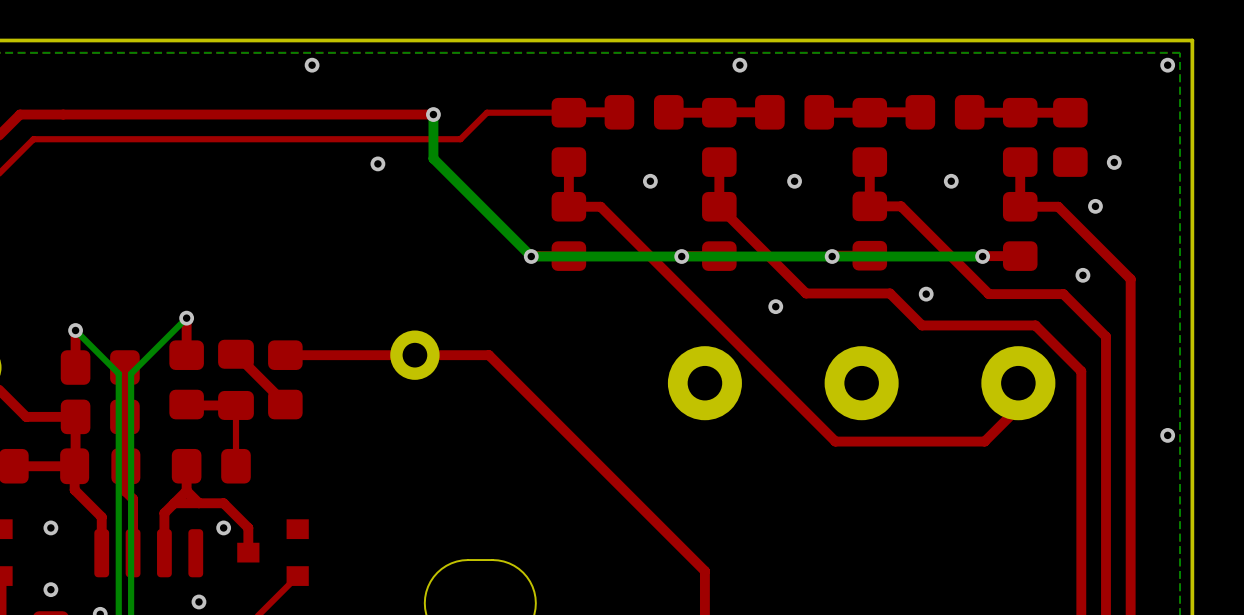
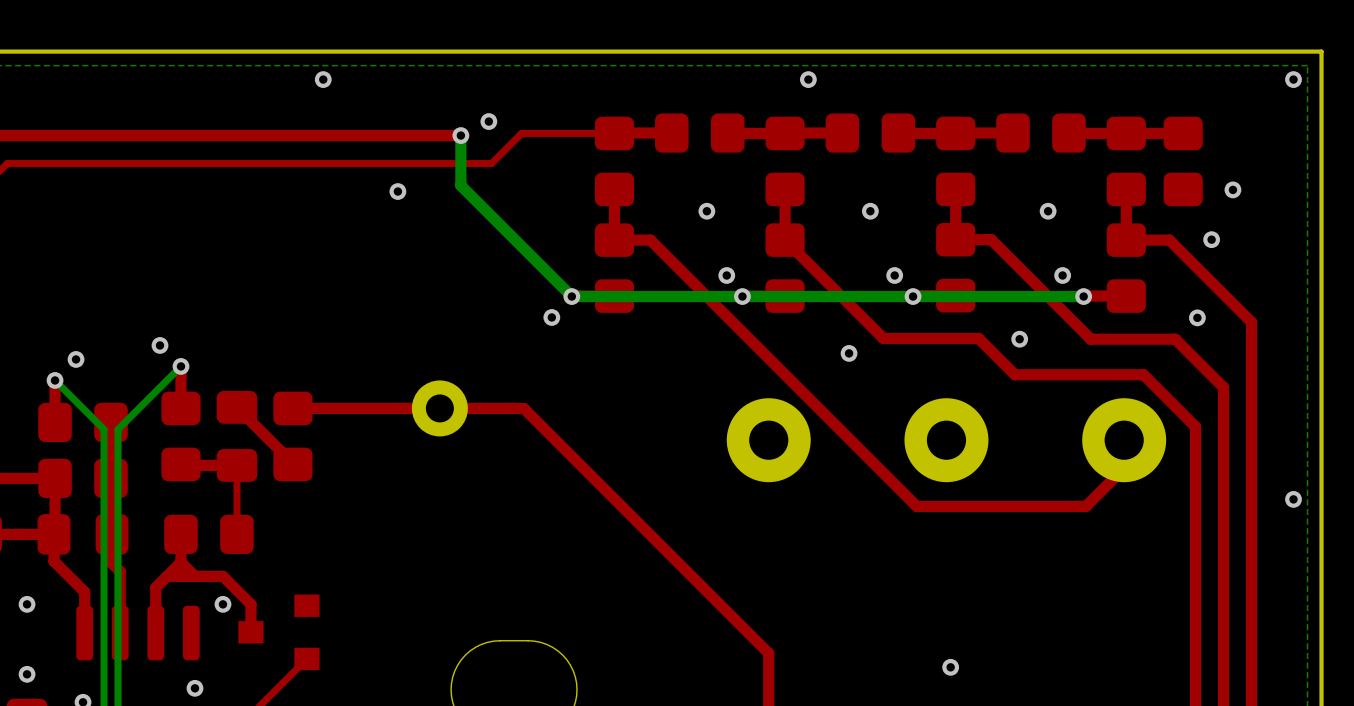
via: none -> (488, 121)
via: none -> (726, 275)
via: none -> (894, 275)
via: none -> (1062, 275)
via: none -> (551, 317)
via: none -> (160, 345)
via: none -> (76, 359)
via: none -> (950, 667)

